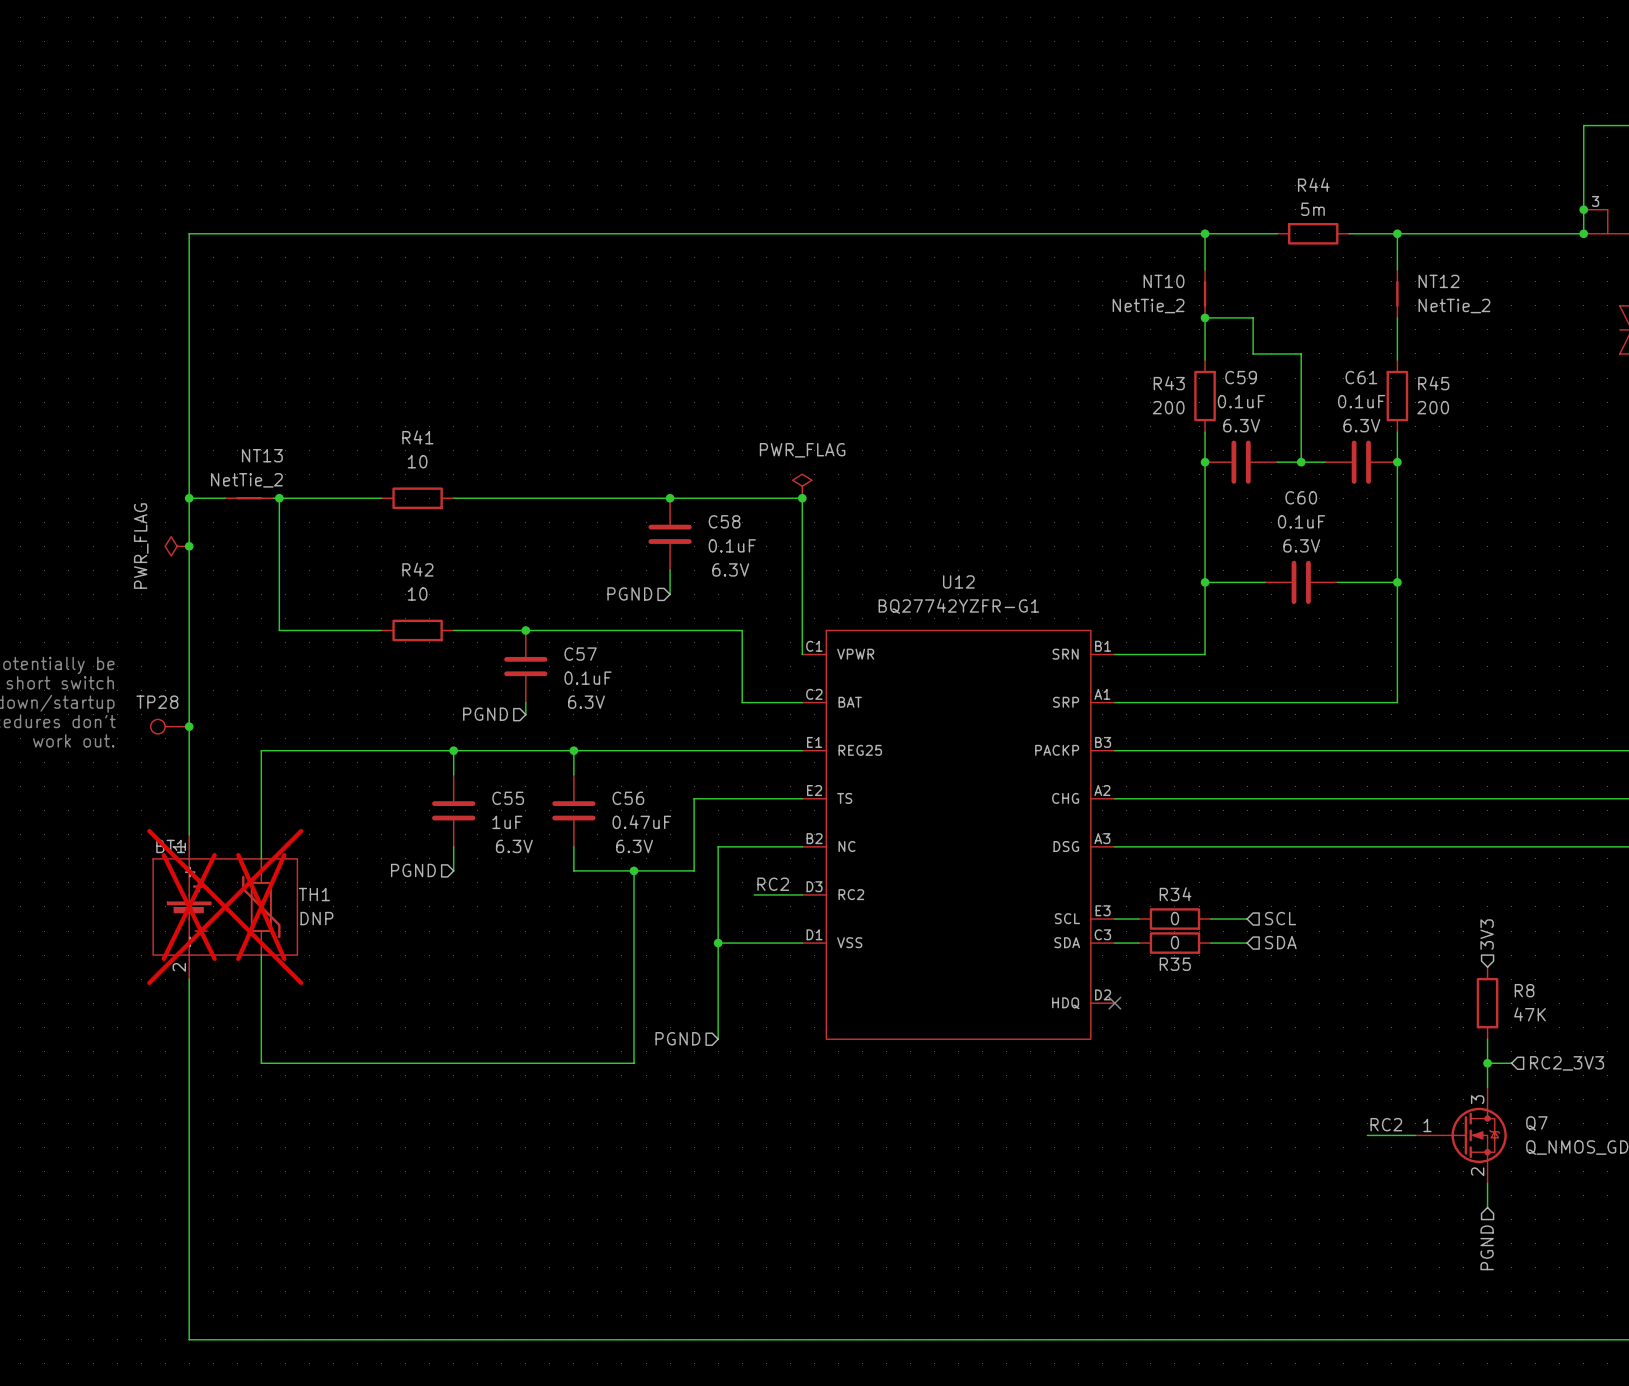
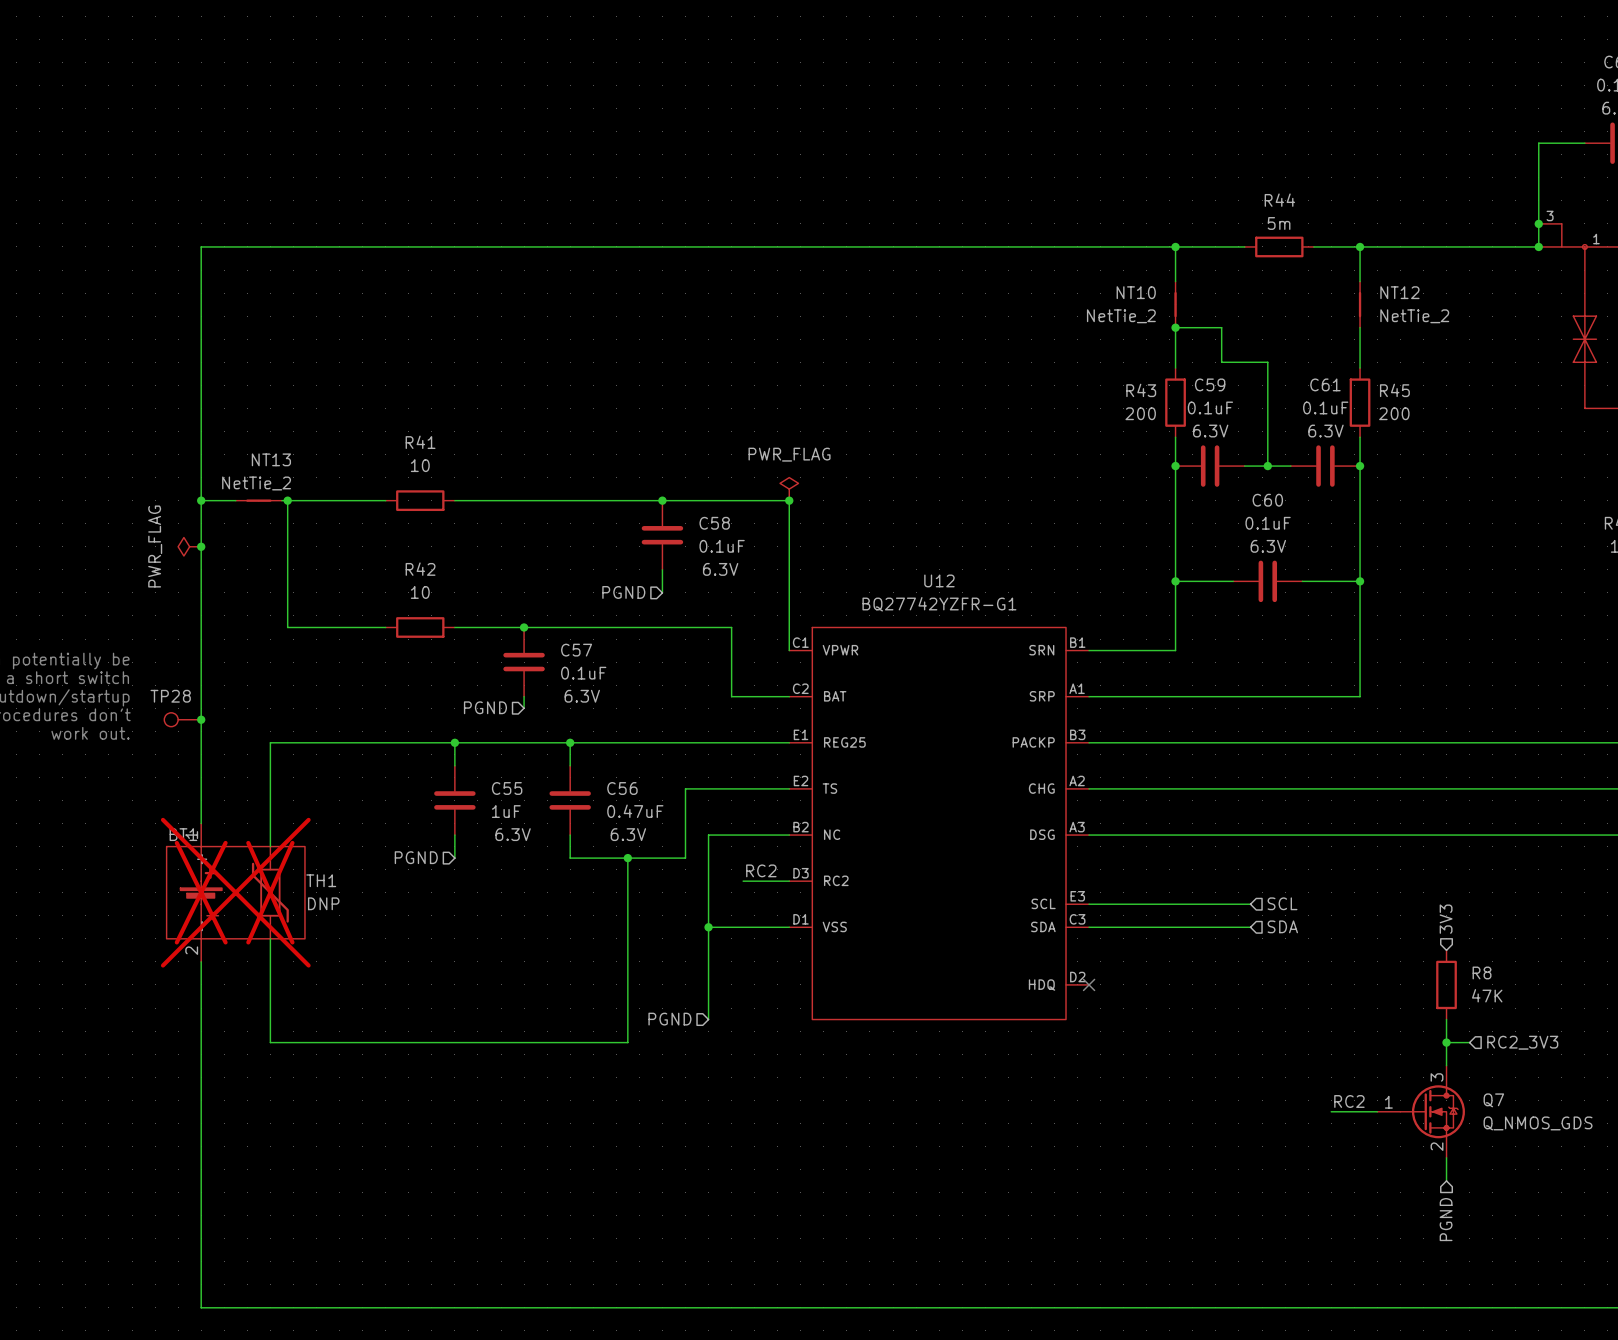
hierarchical label position: SCL (1280, 918) -> SCL (1282, 903)
wire: none -> (1112, 904) (1181, 904)
R34: 0 (1174, 919) -> none
wire: none -> (1215, 904) (1250, 904)
hierarchical label position: SDA (1280, 942) -> SDA (1282, 926)
wire: none -> (1112, 927) (1181, 927)
R35: 0 (1174, 943) -> none
wire: none -> (1215, 927) (1250, 927)

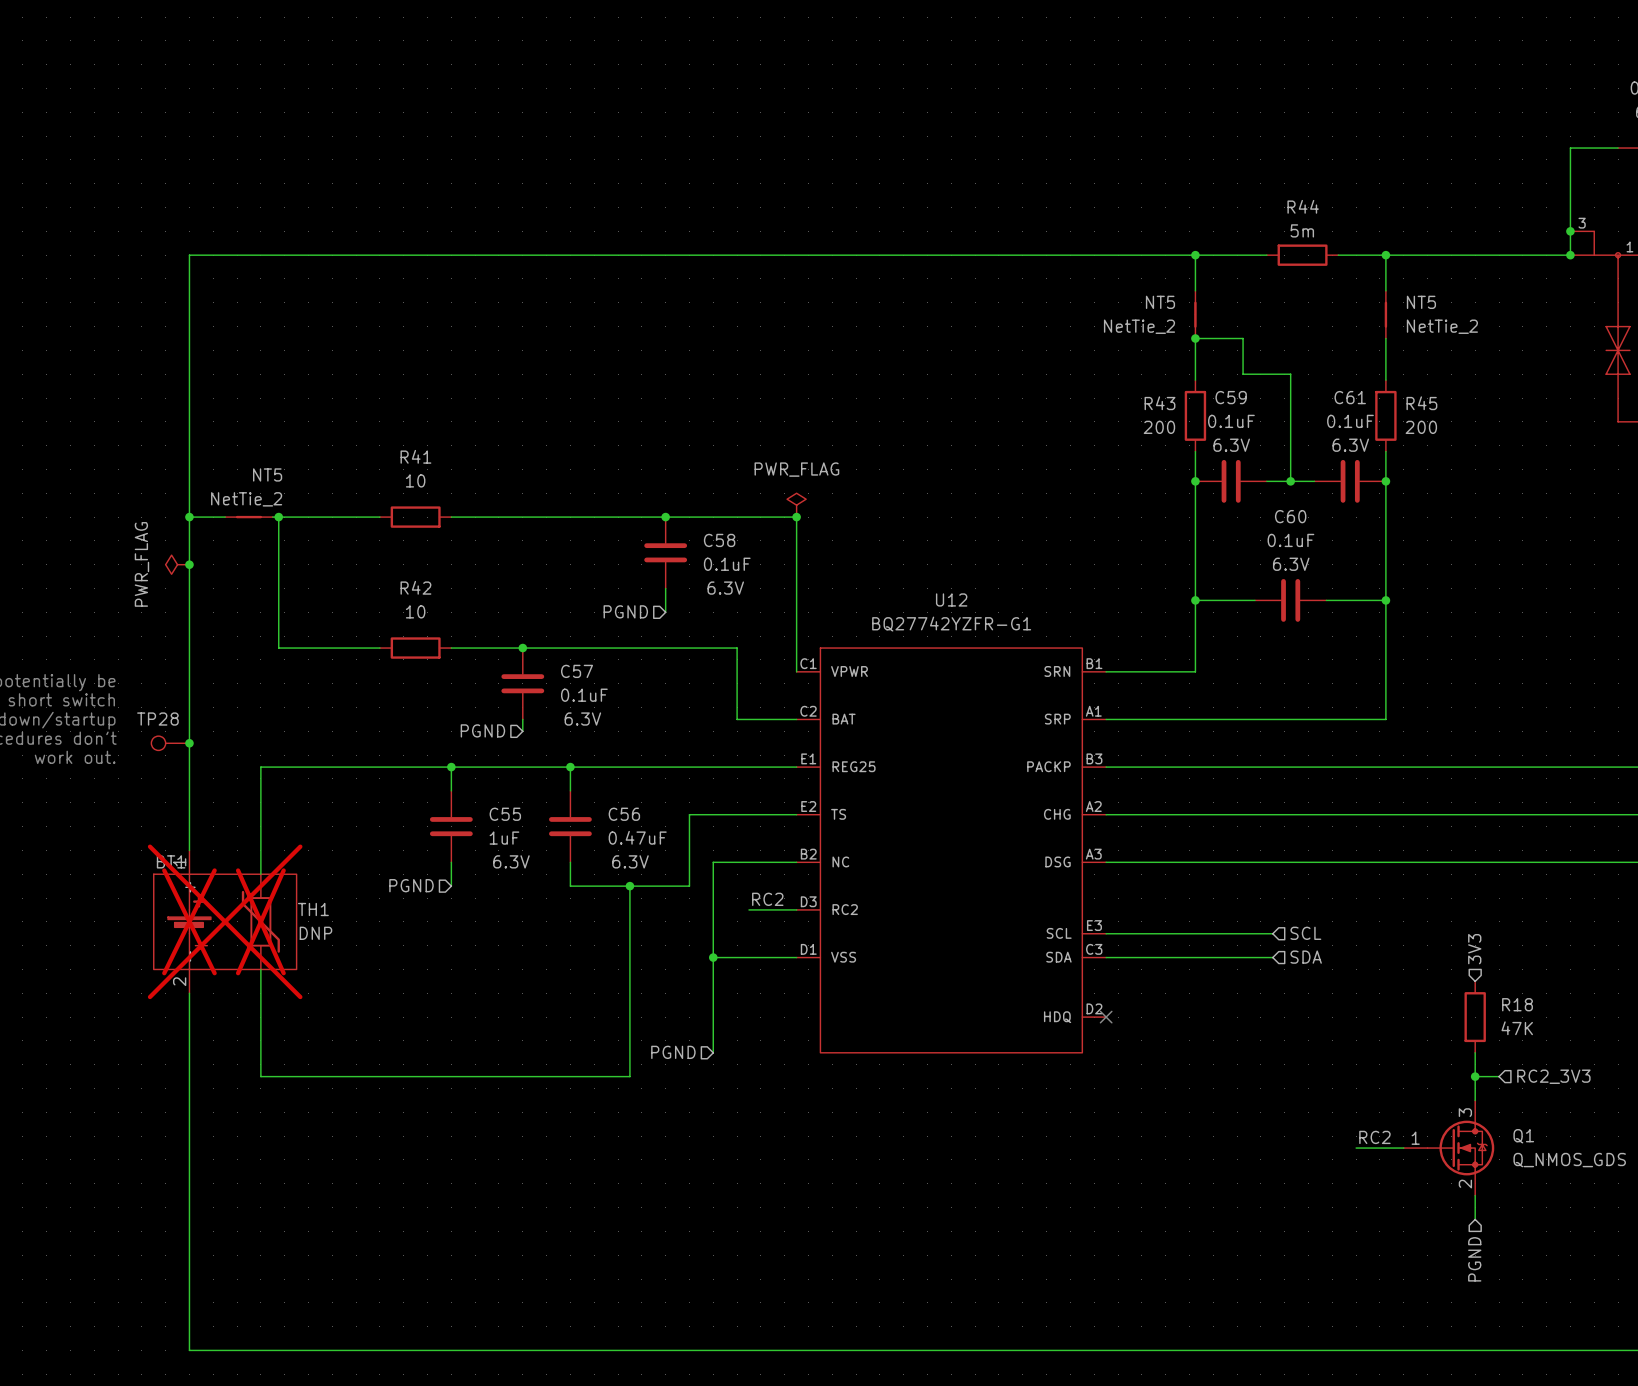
NT10 name: NT10 (1136, 292) -> NT5 (1160, 302)
NT12 name: NT12 (1399, 292) -> NT5 (1421, 302)
NT13 name: NT13 (271, 459) -> NT5 (267, 474)
R8 name: R8 (1482, 972) -> R18 (1517, 1004)
Q7 name: Q7 (1493, 1100) -> Q1 (1523, 1136)

